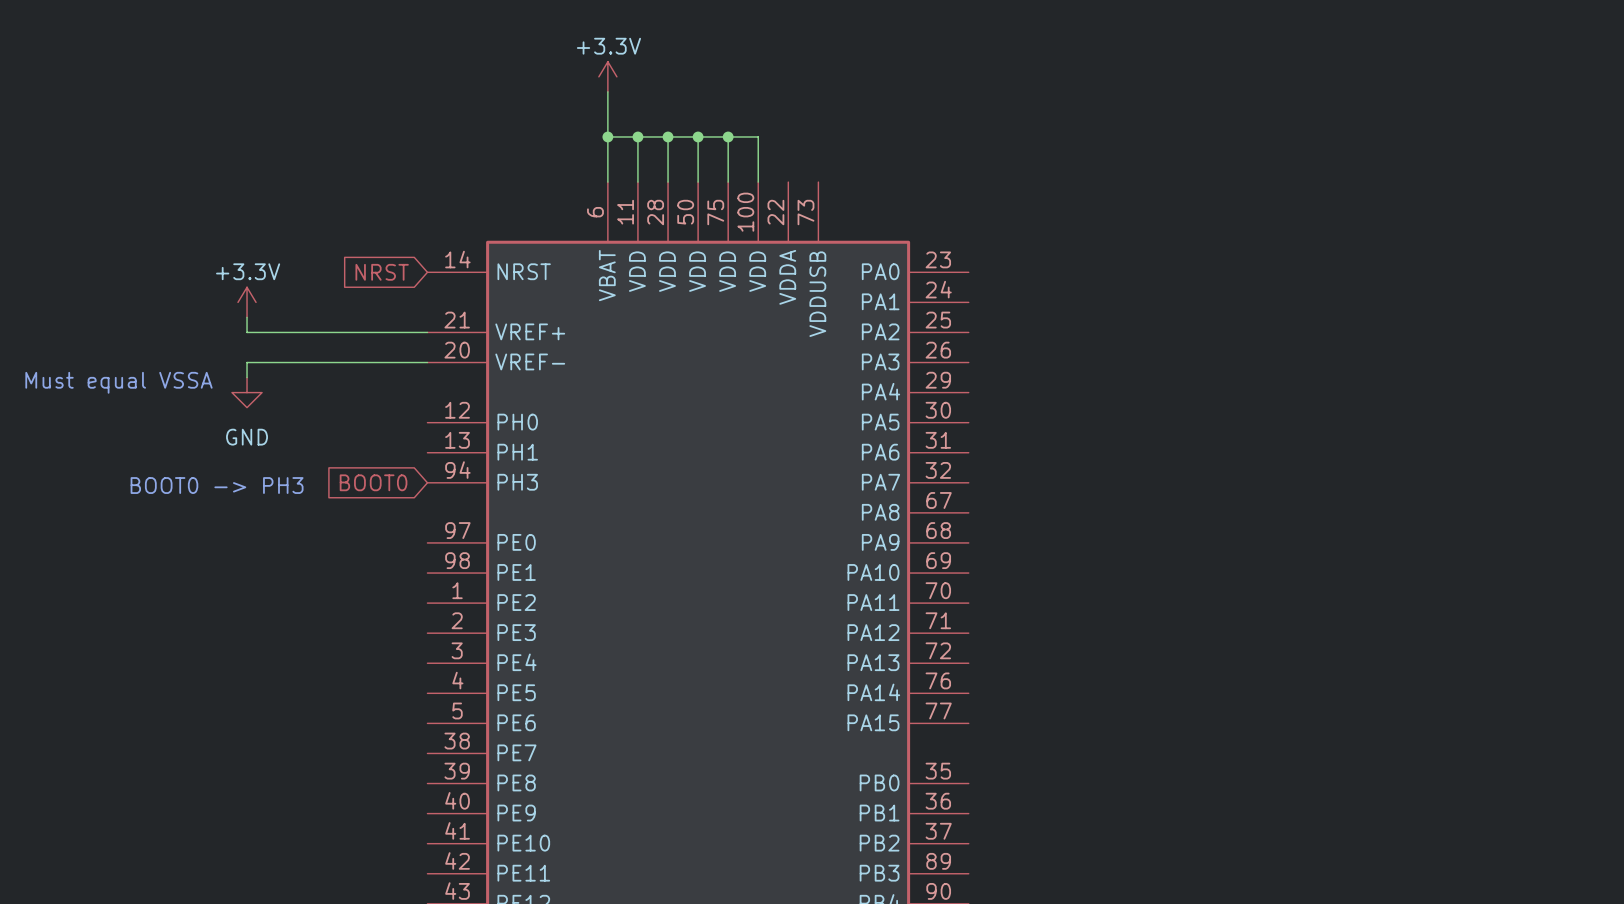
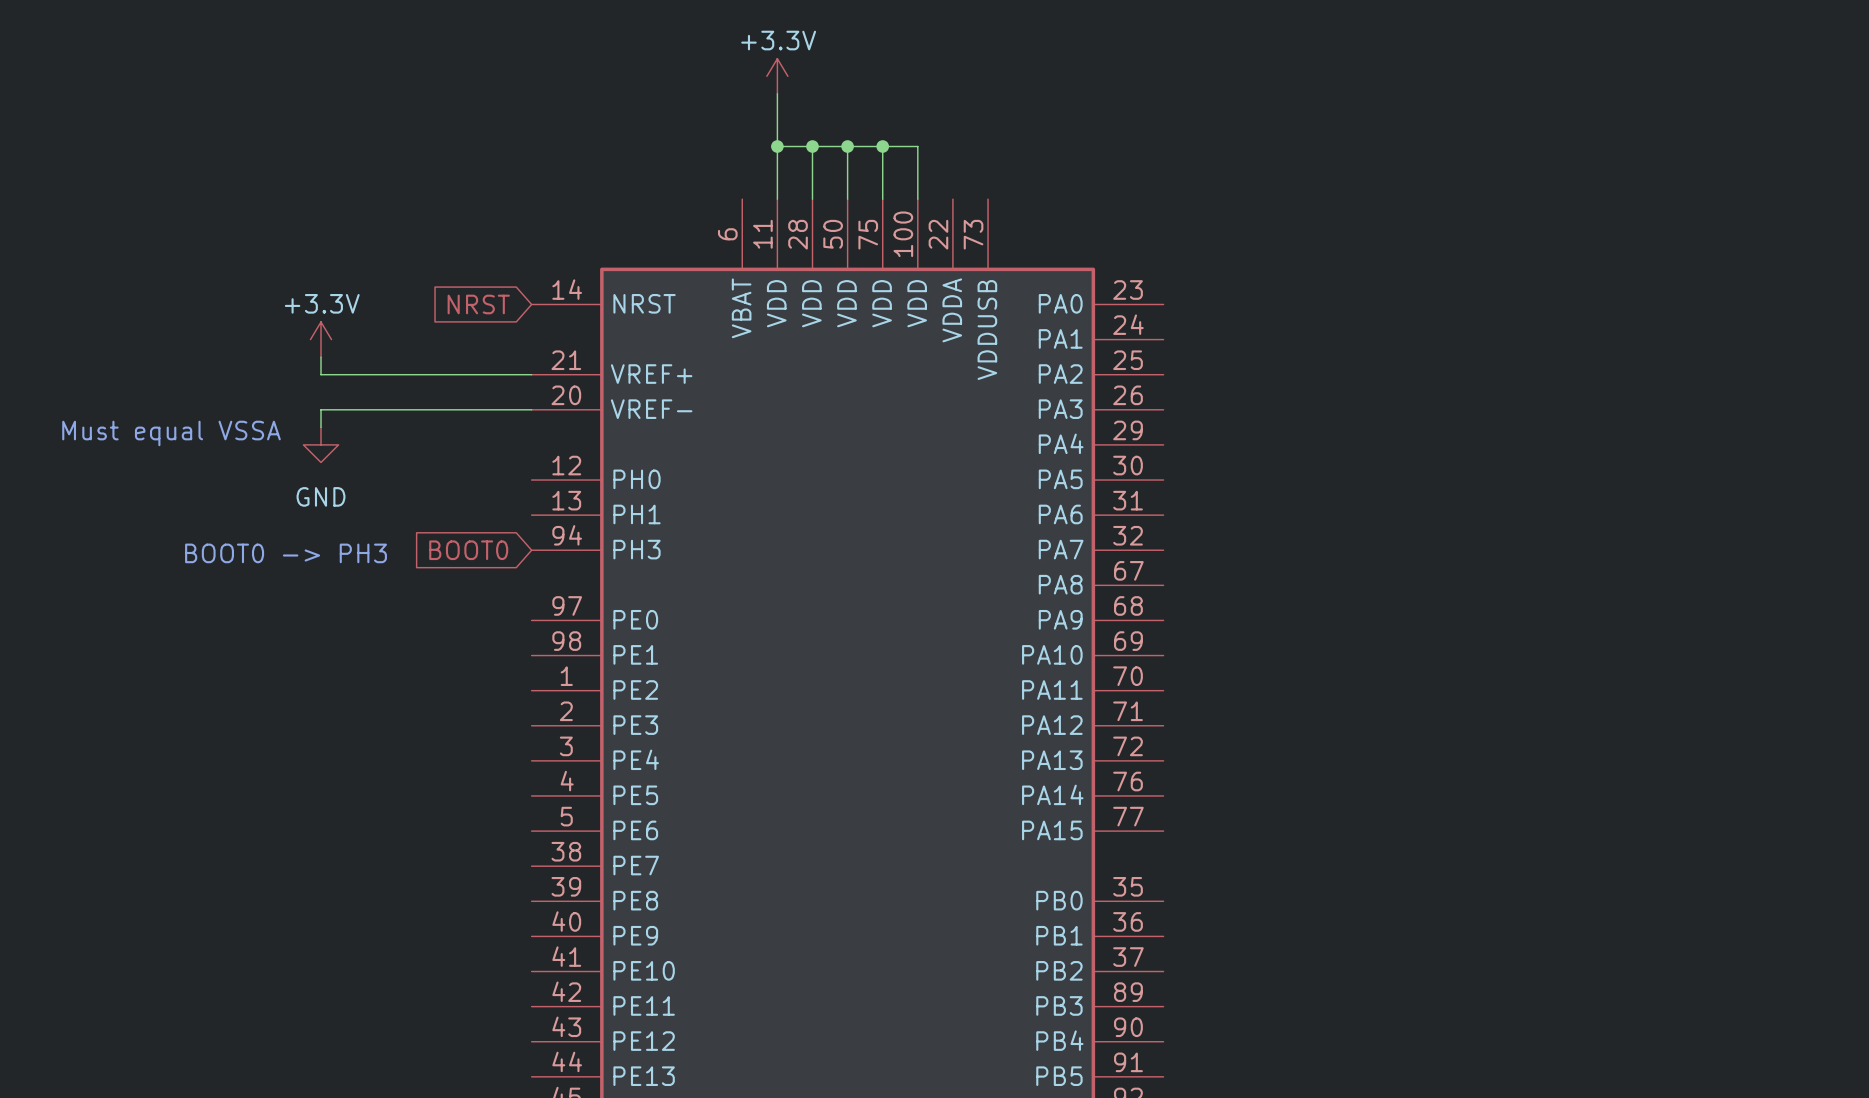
power symbol position: +3.3V (607, 76) -> +3.3V (777, 76)
wire: (607, 91) (607, 182) -> none
wire: (607, 136) (637, 136) -> (777, 93) (777, 146)
junction: (607, 136) -> none

